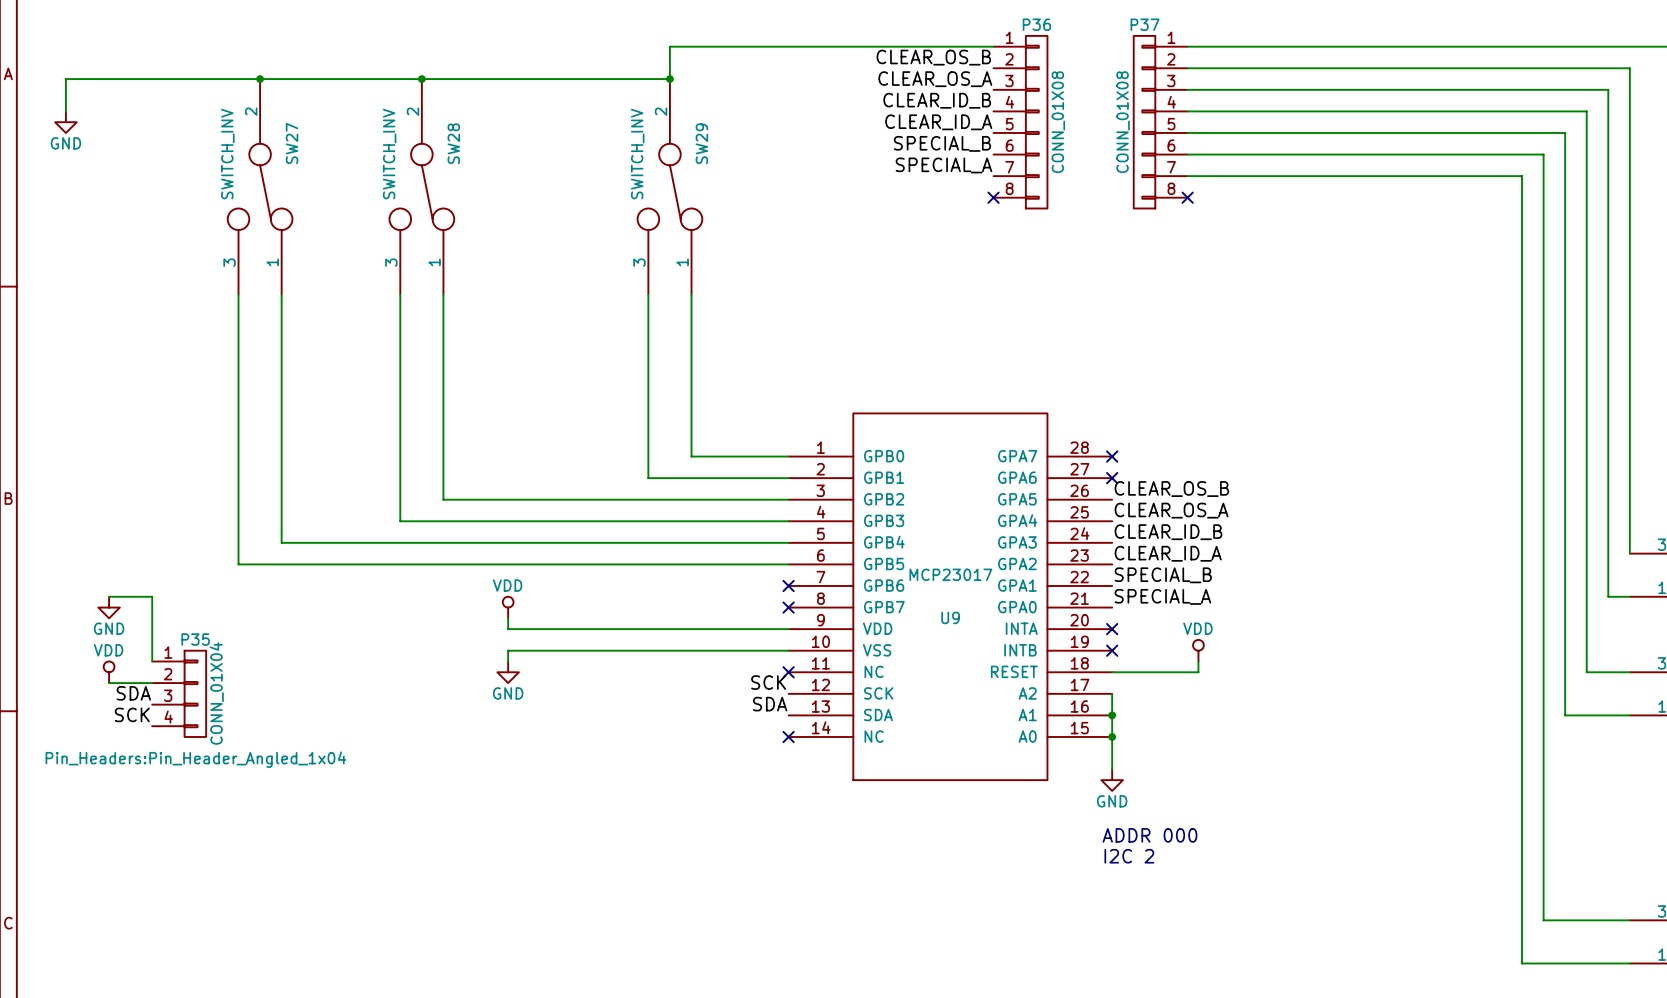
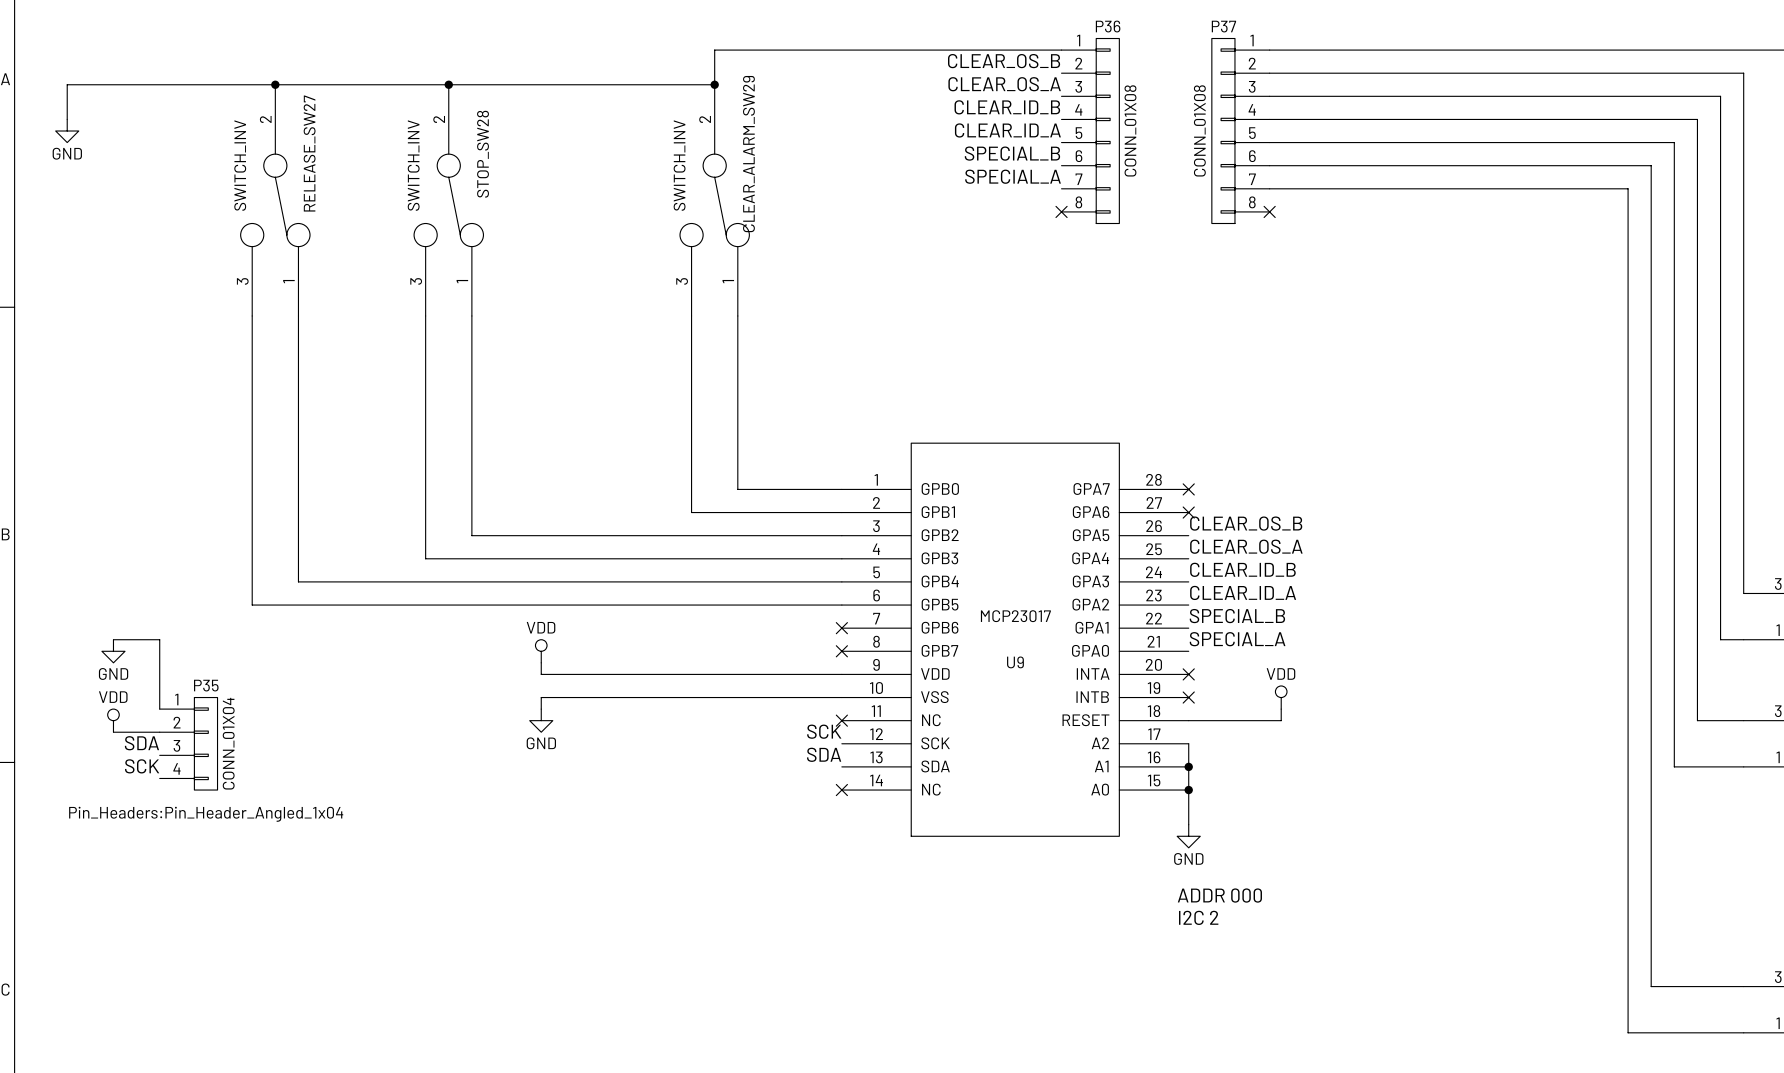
SW27 name: SW27 (292, 143) -> RELEASE_SW27 (309, 153)
SW28 name: SW28 (453, 143) -> STOP_SW28 (483, 154)
SW29 name: SW29 (701, 143) -> CLEAR_ALARM_SW29 (748, 154)

